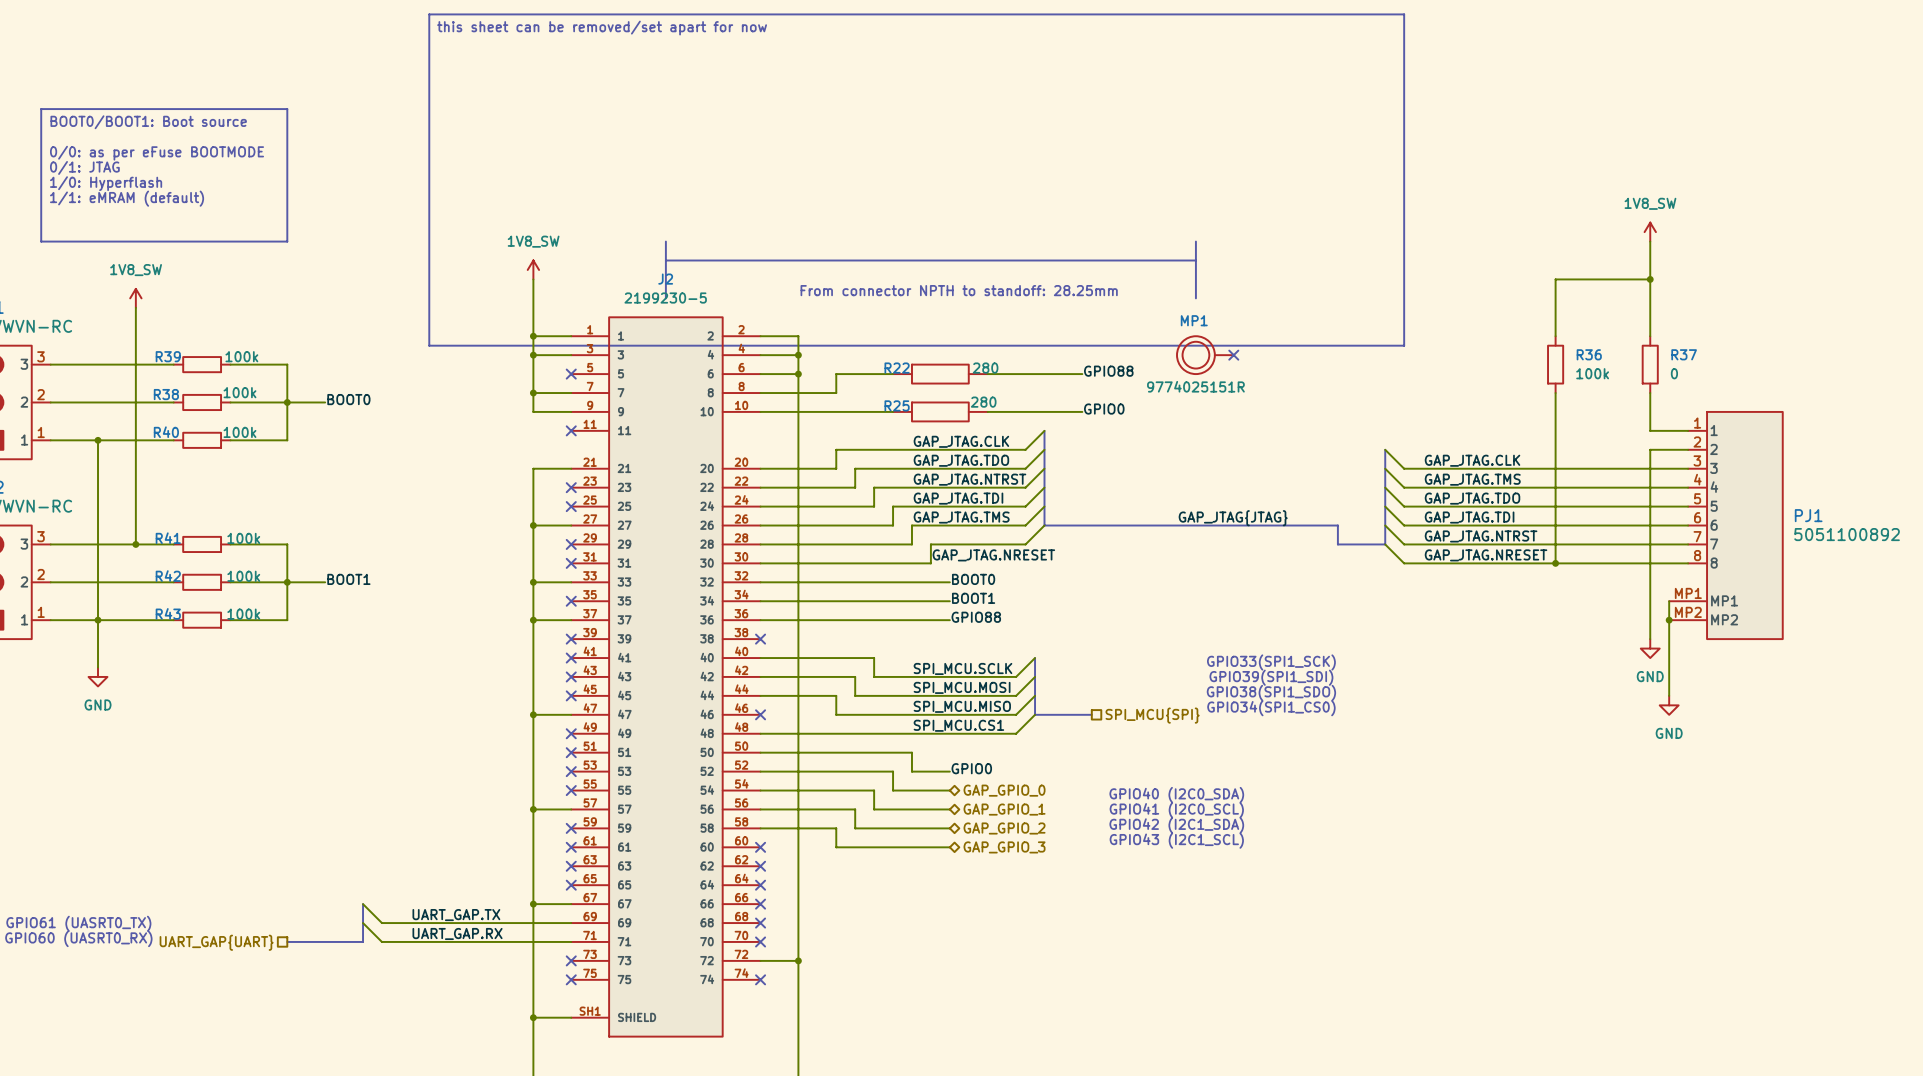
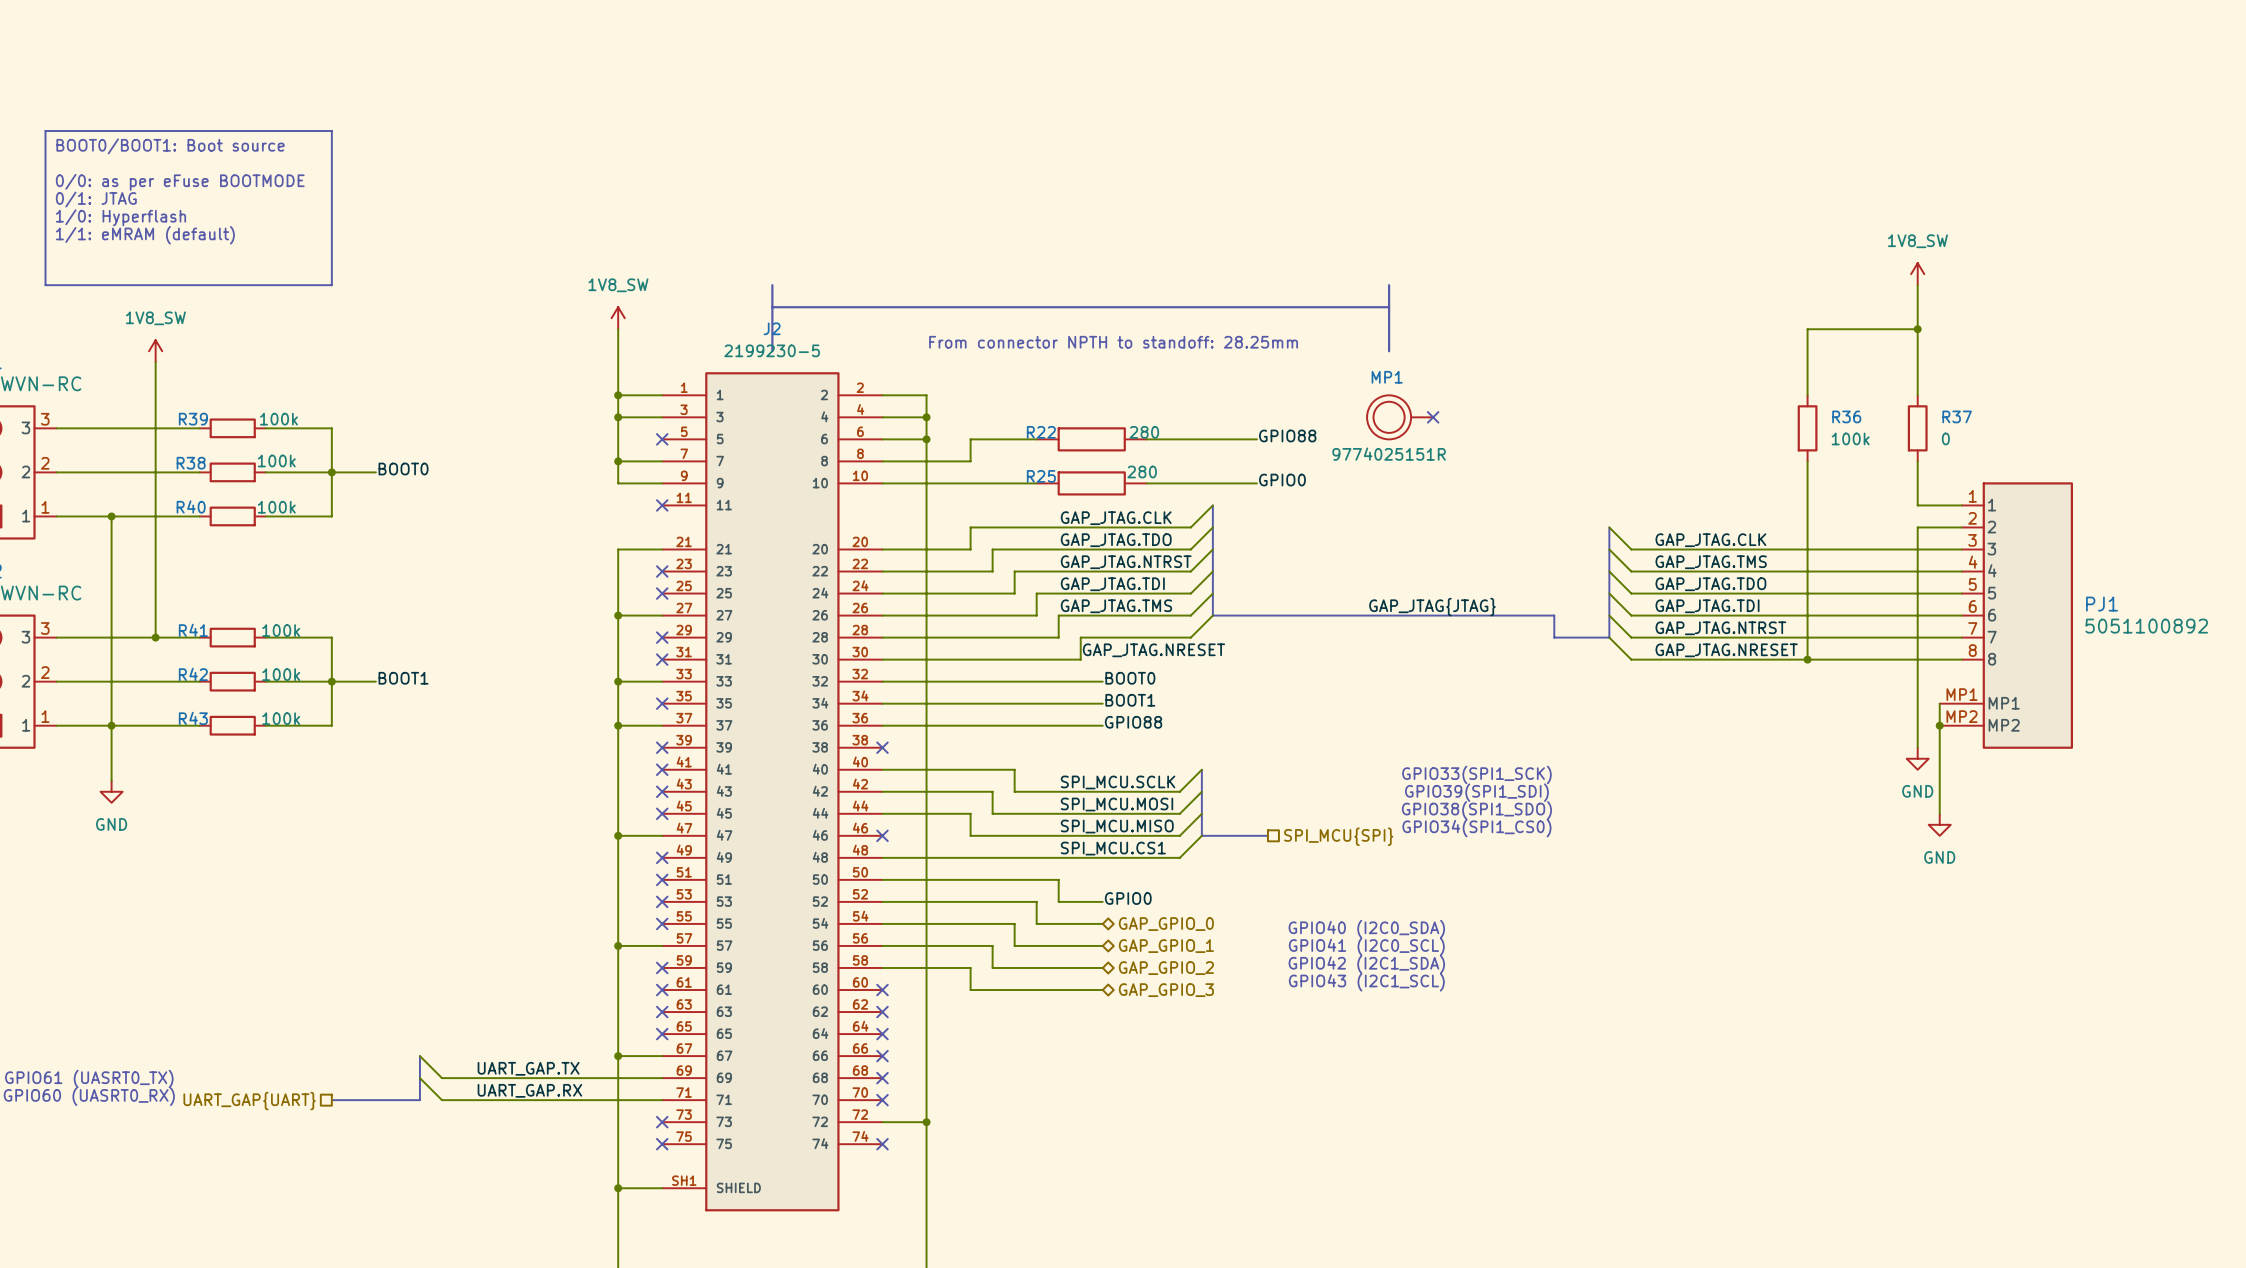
line: (429, 14) (1404, 14) (1404, 345) (429, 345) (429, 14) -> none
text: this sheet can be removed/set apart for now (602, 28) -> none

